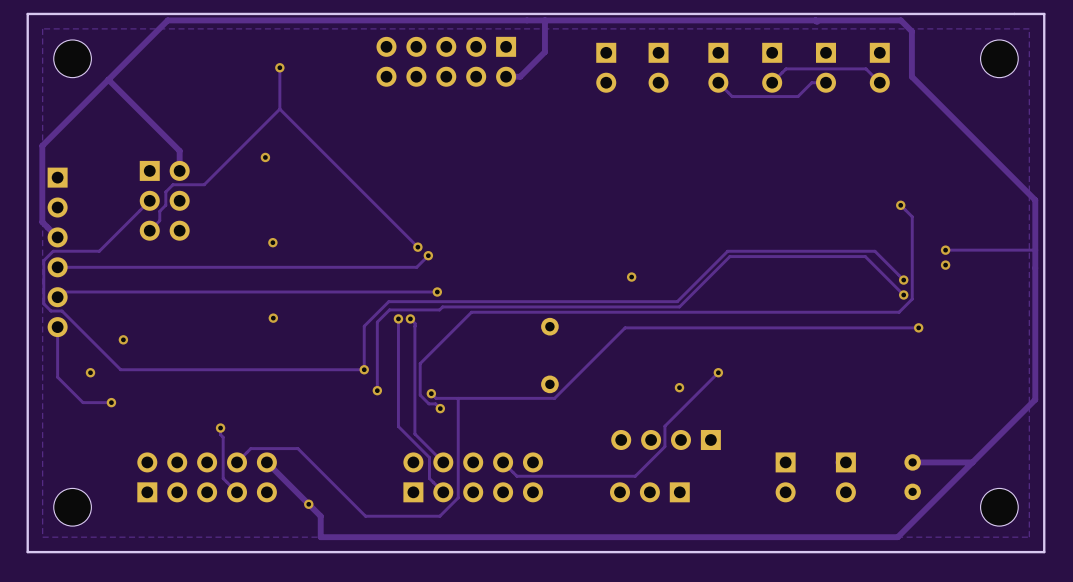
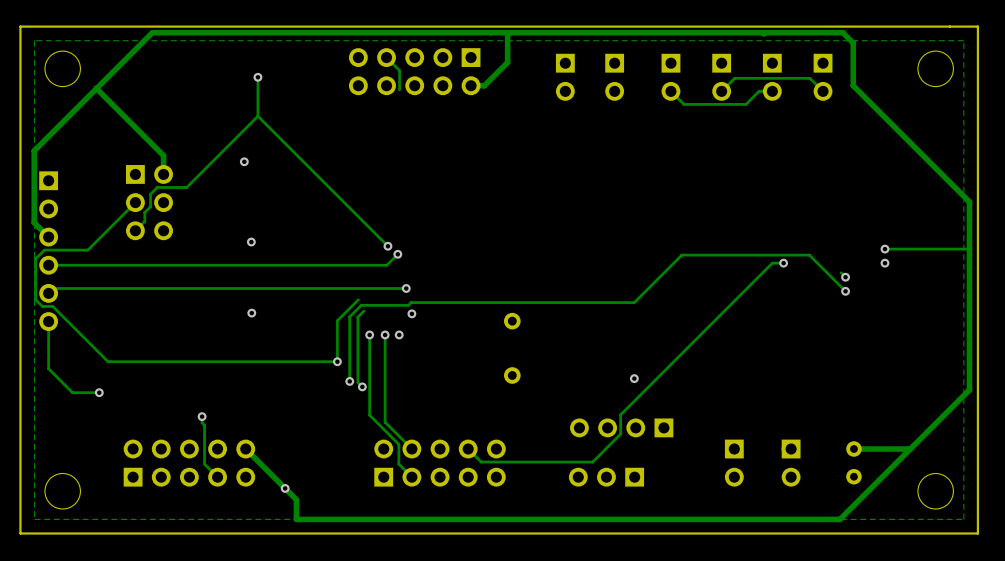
track: none -> (386, 57) (399, 70) (399, 89)
track: (900, 205) (912, 216) (912, 299) (899, 312) (471, 312) (420, 363) (420, 395) (428, 403) (435, 403) (440, 408) -> none
via: (900, 205) -> none
track: none -> (783, 263) (772, 263) (670, 364)
via: none -> (783, 263)
track: (899, 275) (874, 251) (727, 251) (677, 301) (388, 301) (386, 303) -> none
via: (631, 277) -> none
track: none -> (364, 311) (357, 317) (357, 382) (362, 386)
track: (398, 318) (398, 341) -> none
via: (398, 318) -> none
track: (410, 318) (415, 323) (414, 341) -> none
via: (410, 318) -> none
via: none -> (411, 313)
track: (918, 327) (625, 327) (554, 398) (436, 398) (431, 393) -> none
via: (918, 327) -> none
via: (123, 339) -> none
via: none -> (369, 334)
via: none -> (385, 334)
via: none -> (399, 334)
via: (90, 372) -> none
via: (718, 372) -> none
via: (431, 393) -> none
via: none -> (362, 386)
track: (458, 398) (458, 497) (439, 516) (365, 516) (297, 448) (250, 448) (237, 462) -> none
via: (440, 408) -> none

